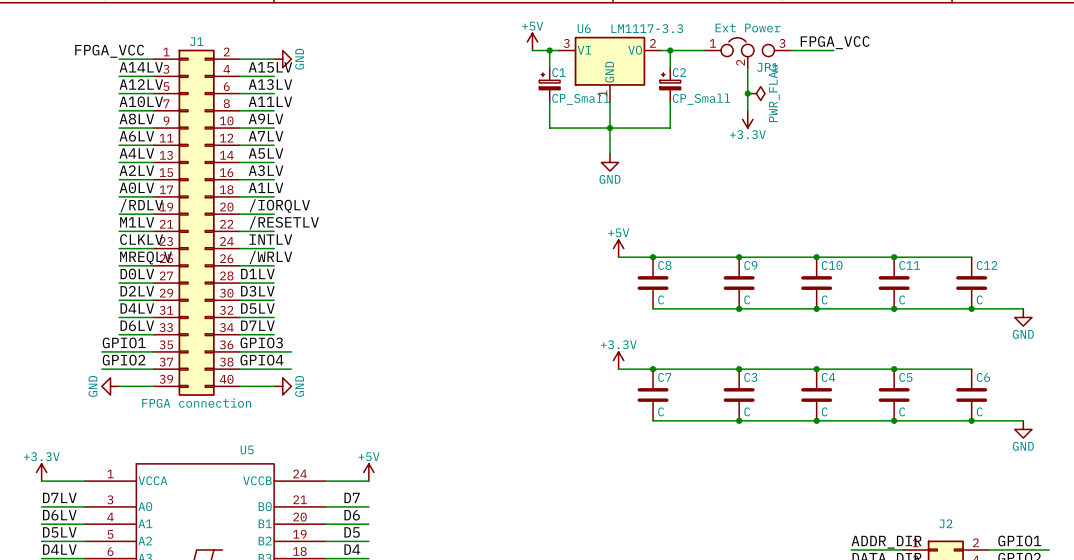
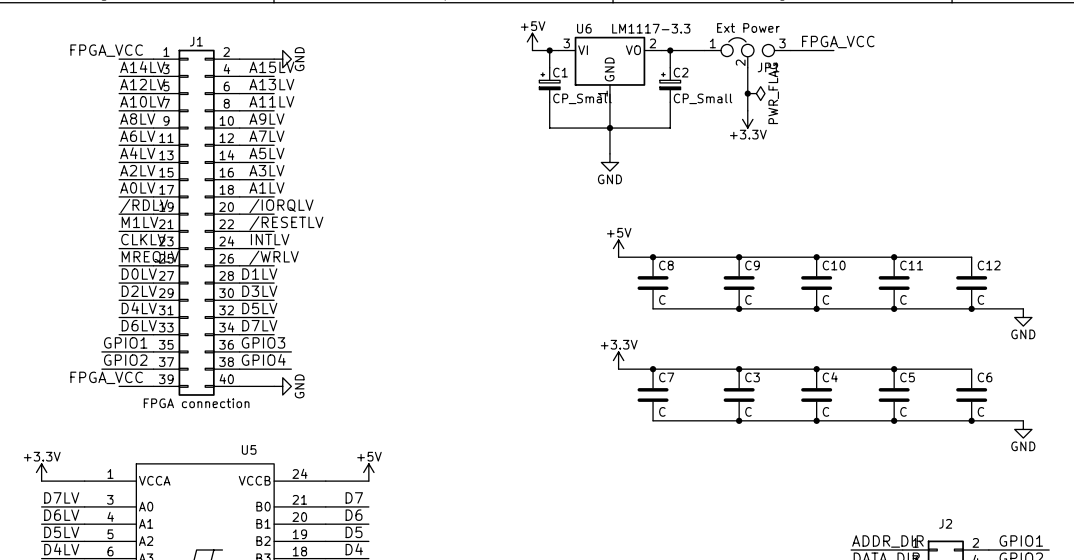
label: none -> FPGA_VCC (106, 377)
power symbol: GND (110, 386) -> none

